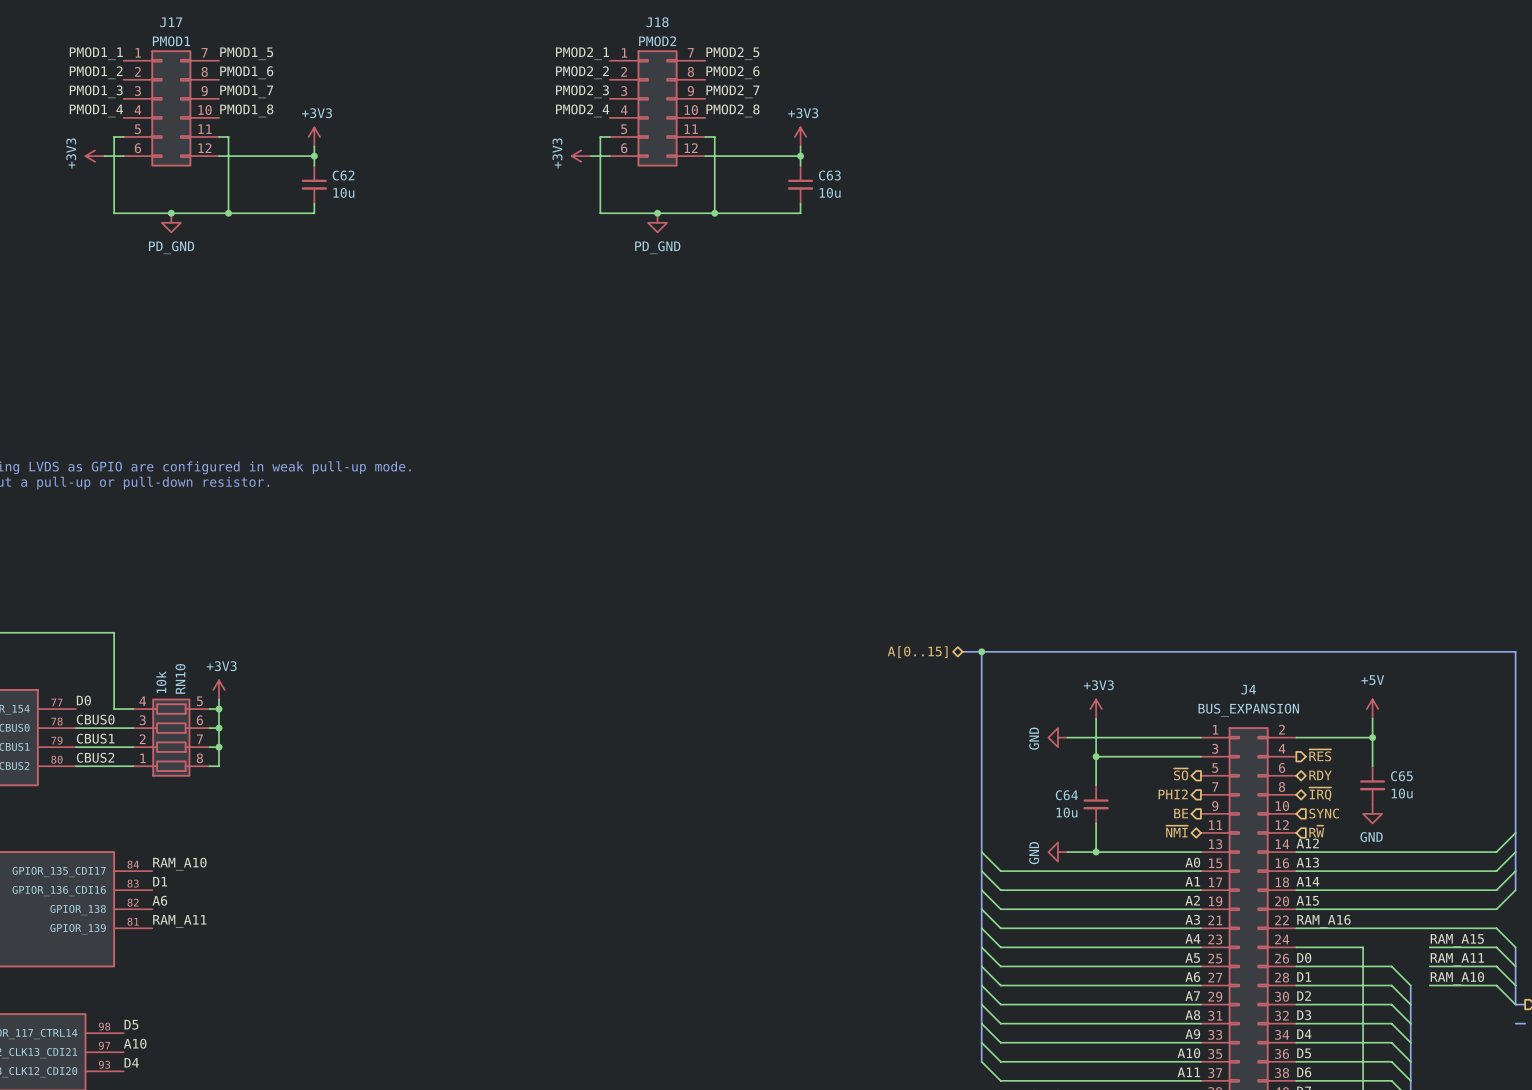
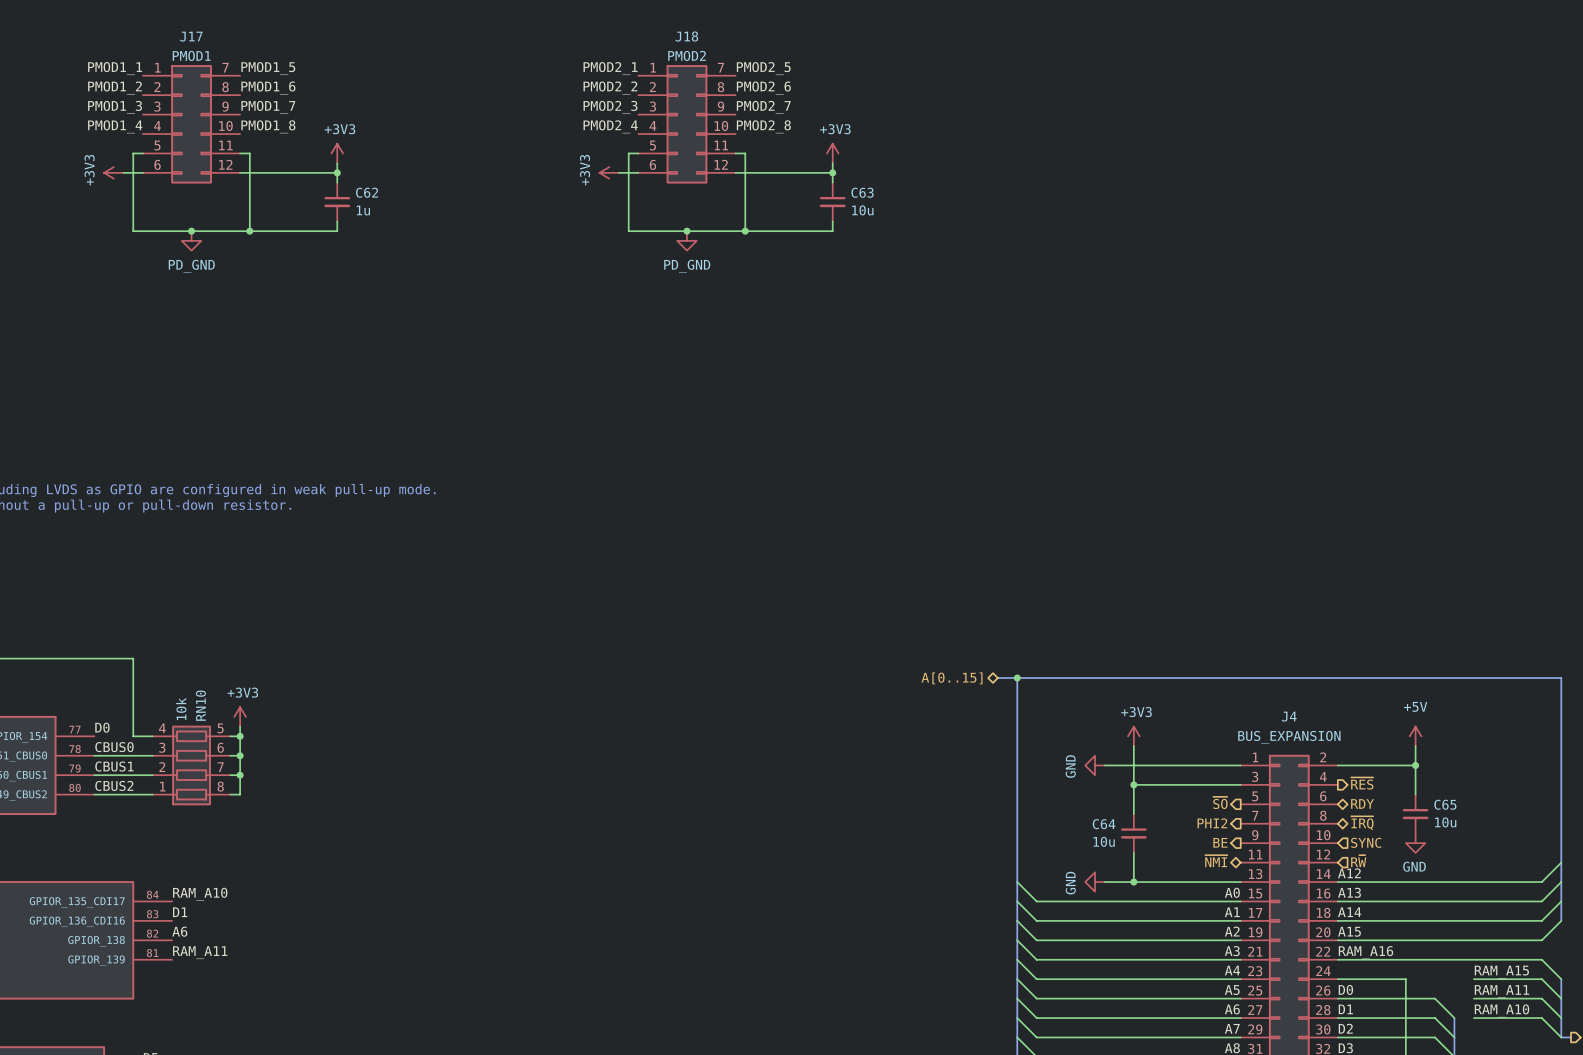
C62 value: 10u (343, 192) -> 1u (363, 210)

